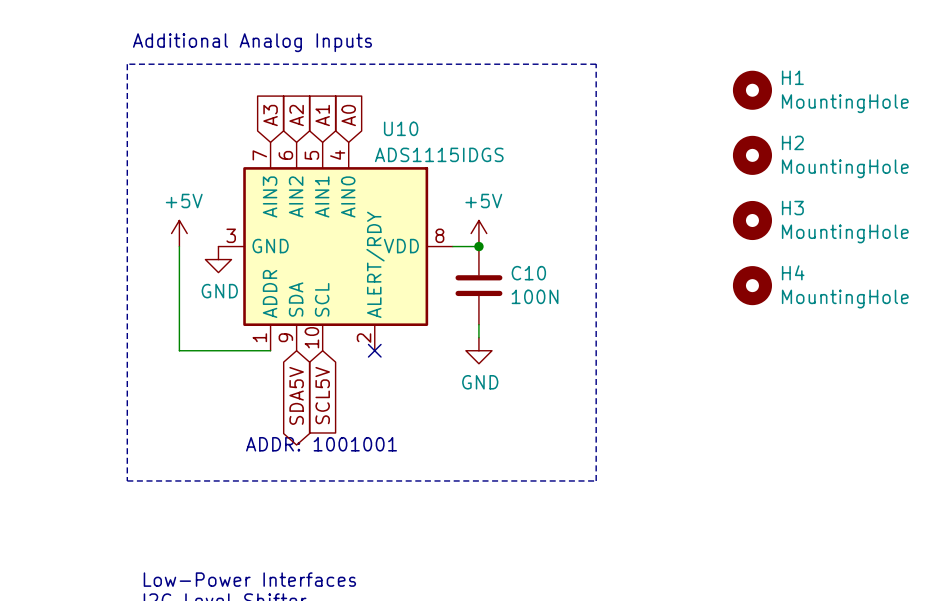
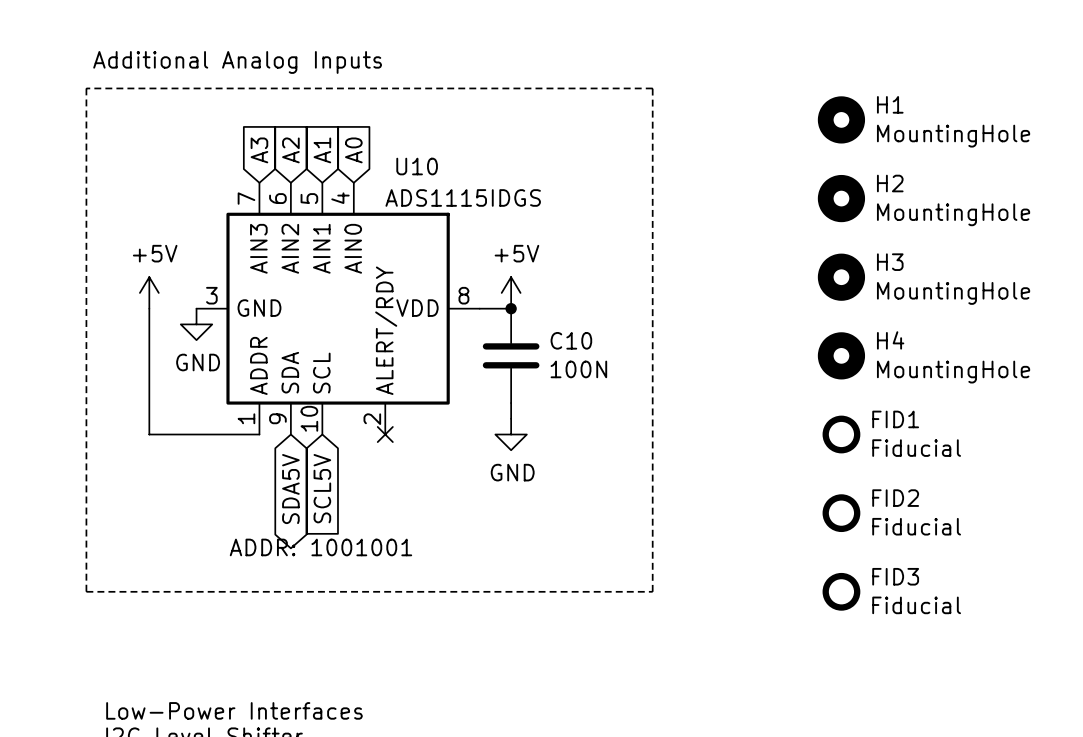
FID1: none -> Fiducial (841, 434)
FID2: none -> Fiducial (841, 513)
FID3: none -> Fiducial (841, 591)

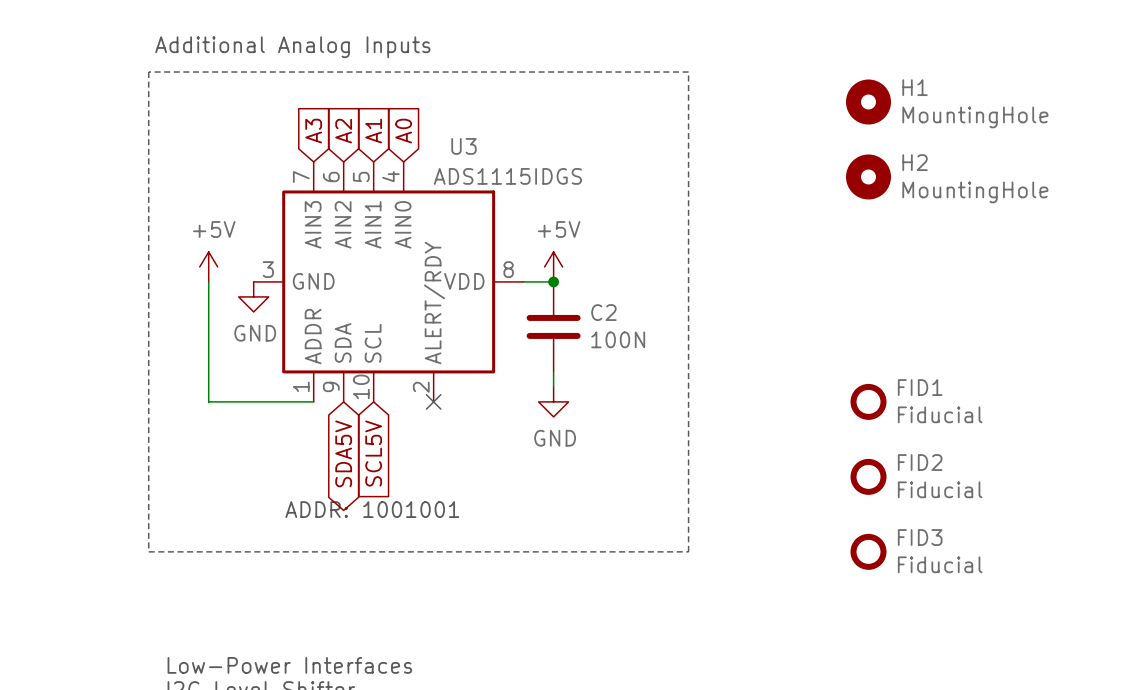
U10 name: U10 (417, 166) -> U3 (463, 146)
H3: MountingHole (841, 277) -> none
C10 name: C10 (571, 340) -> C2 (603, 312)
H4: MountingHole (841, 355) -> none

